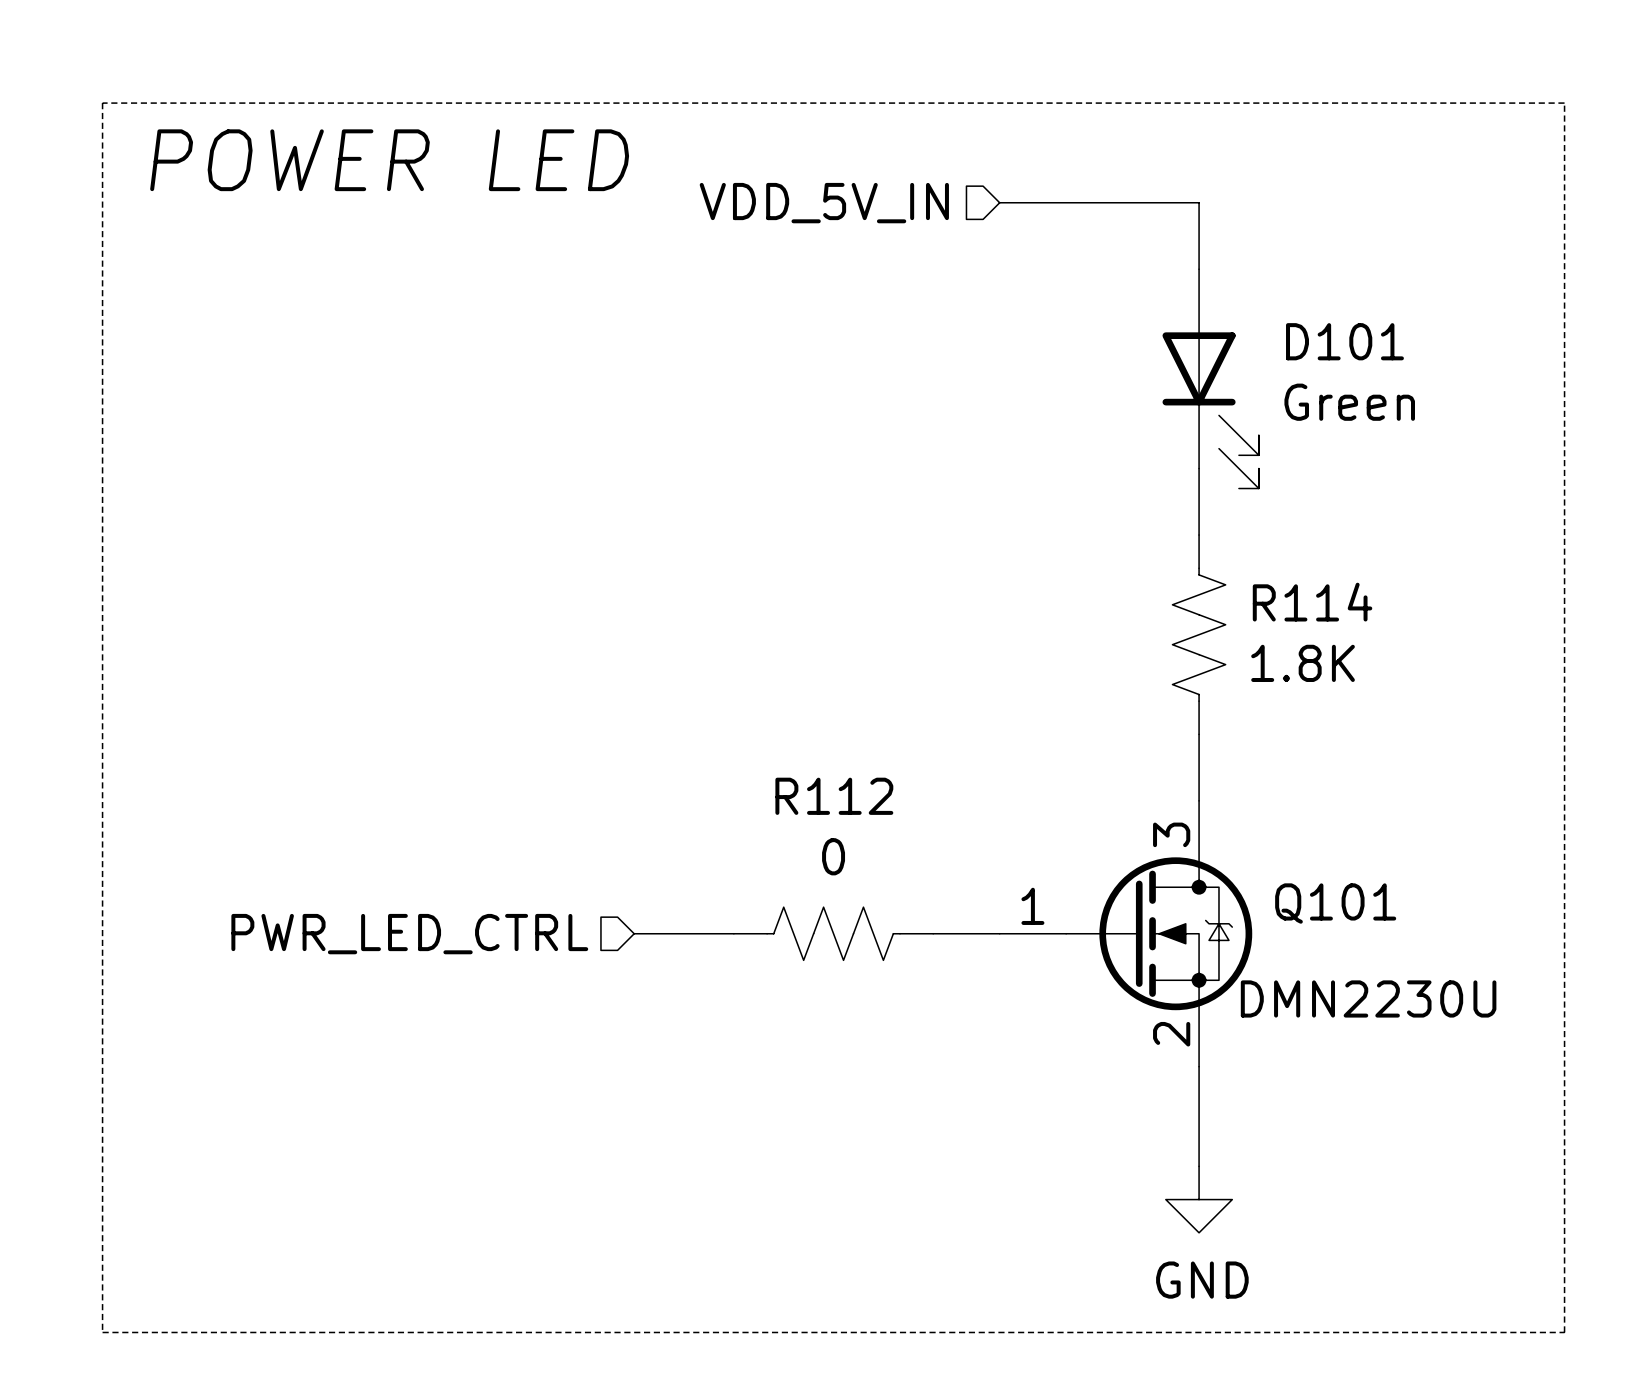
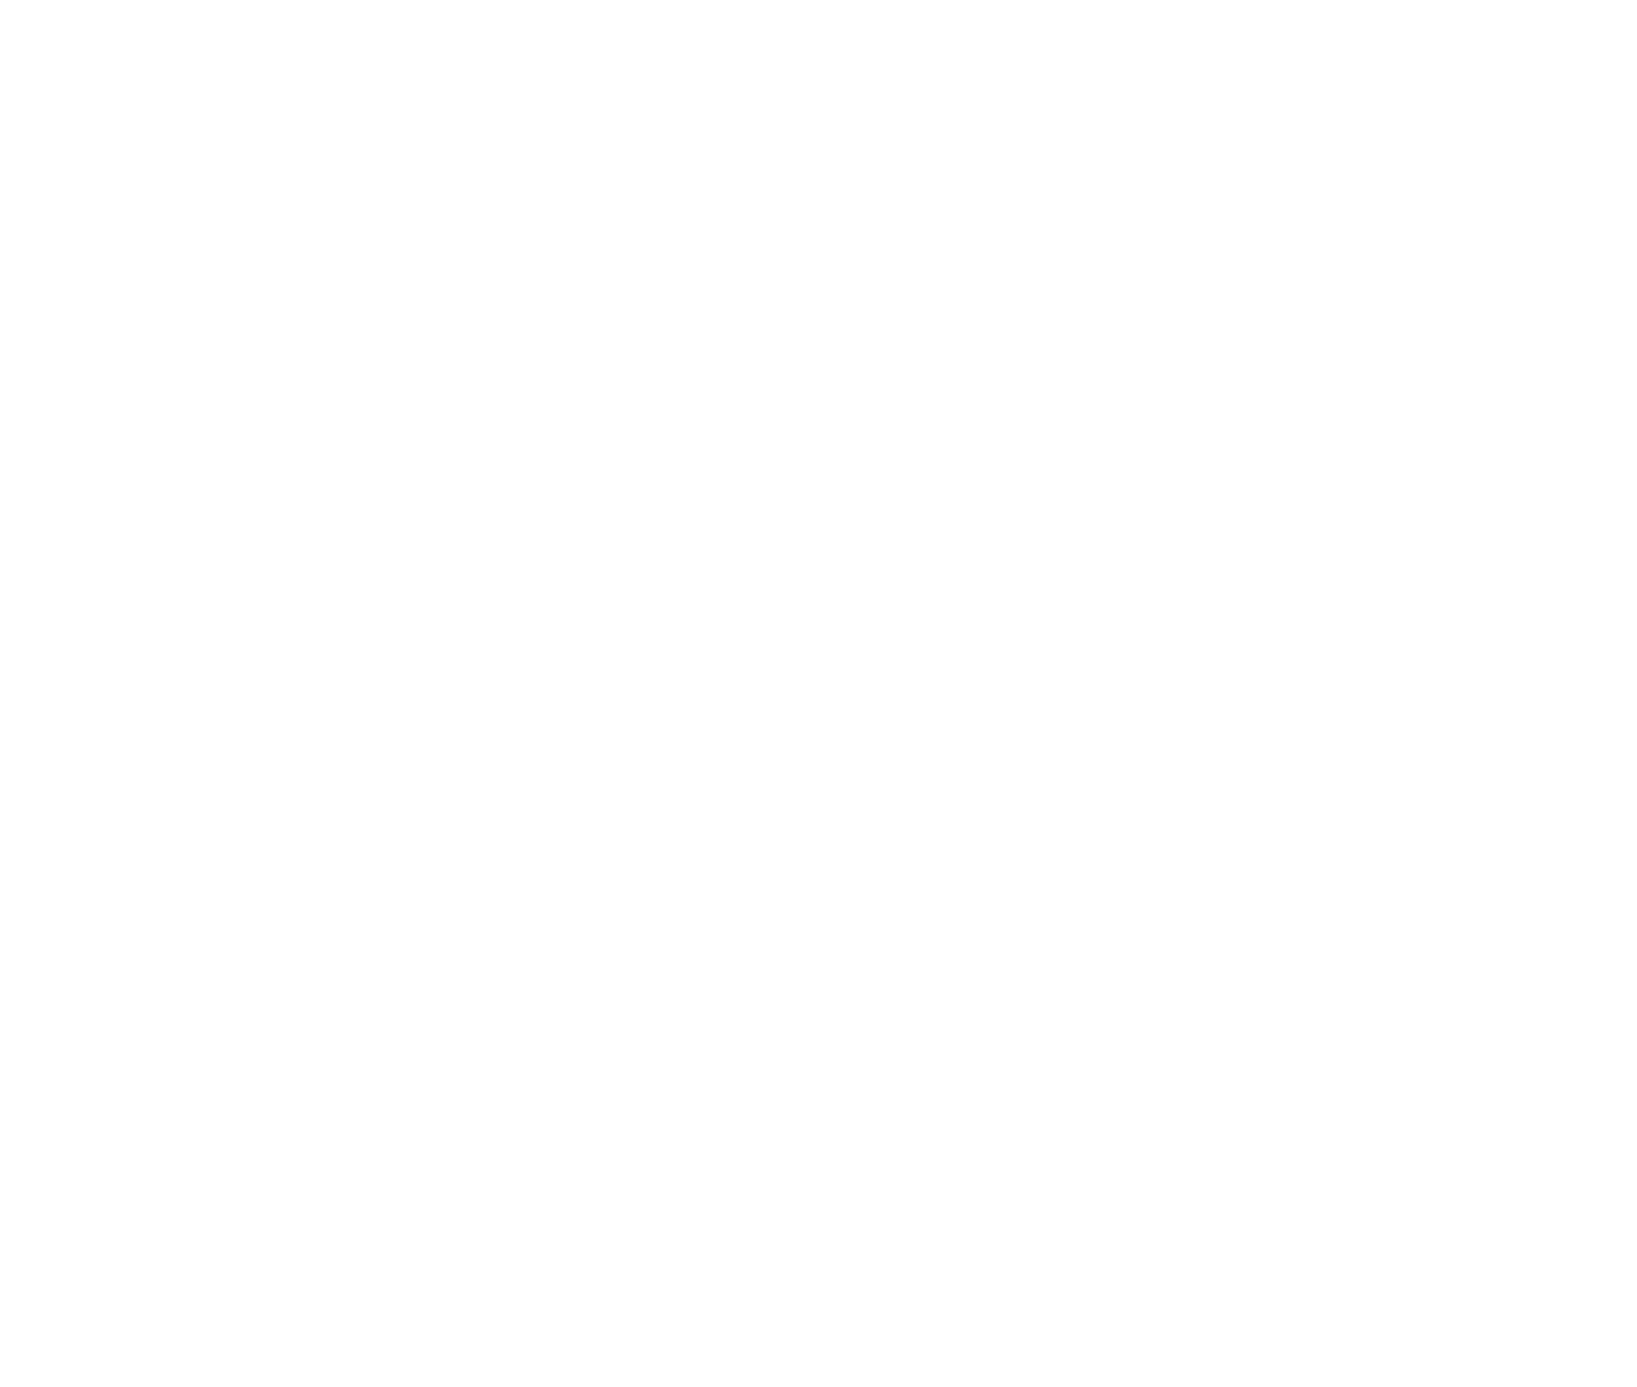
line: (102, 103) (1564, 103) (1564, 1332) (102, 1332) (102, 103) -> none
text: POWER LED (389, 160) -> none
wire: (999, 202) (1199, 202) (1199, 269) -> none
hierarchical label: VDD_5V_IN (824, 203) -> none
D101: Green (1210, 378) -> none
wire: (1199, 468) (1199, 535) -> none
R114: 1.8K (1199, 634) -> none
wire: (1199, 734) (1199, 800) -> none
wire: (634, 933) (733, 933) -> none
R112: 0 (833, 933) -> none
wire: (933, 933) (999, 933) -> none
Q101: DMN2230U (1125, 933) -> none
hierarchical label: PWR_LED_CTRL (409, 934) -> none
wire: (1199, 1066) (1199, 1166) -> none
power symbol: GND (1199, 1199) -> none

